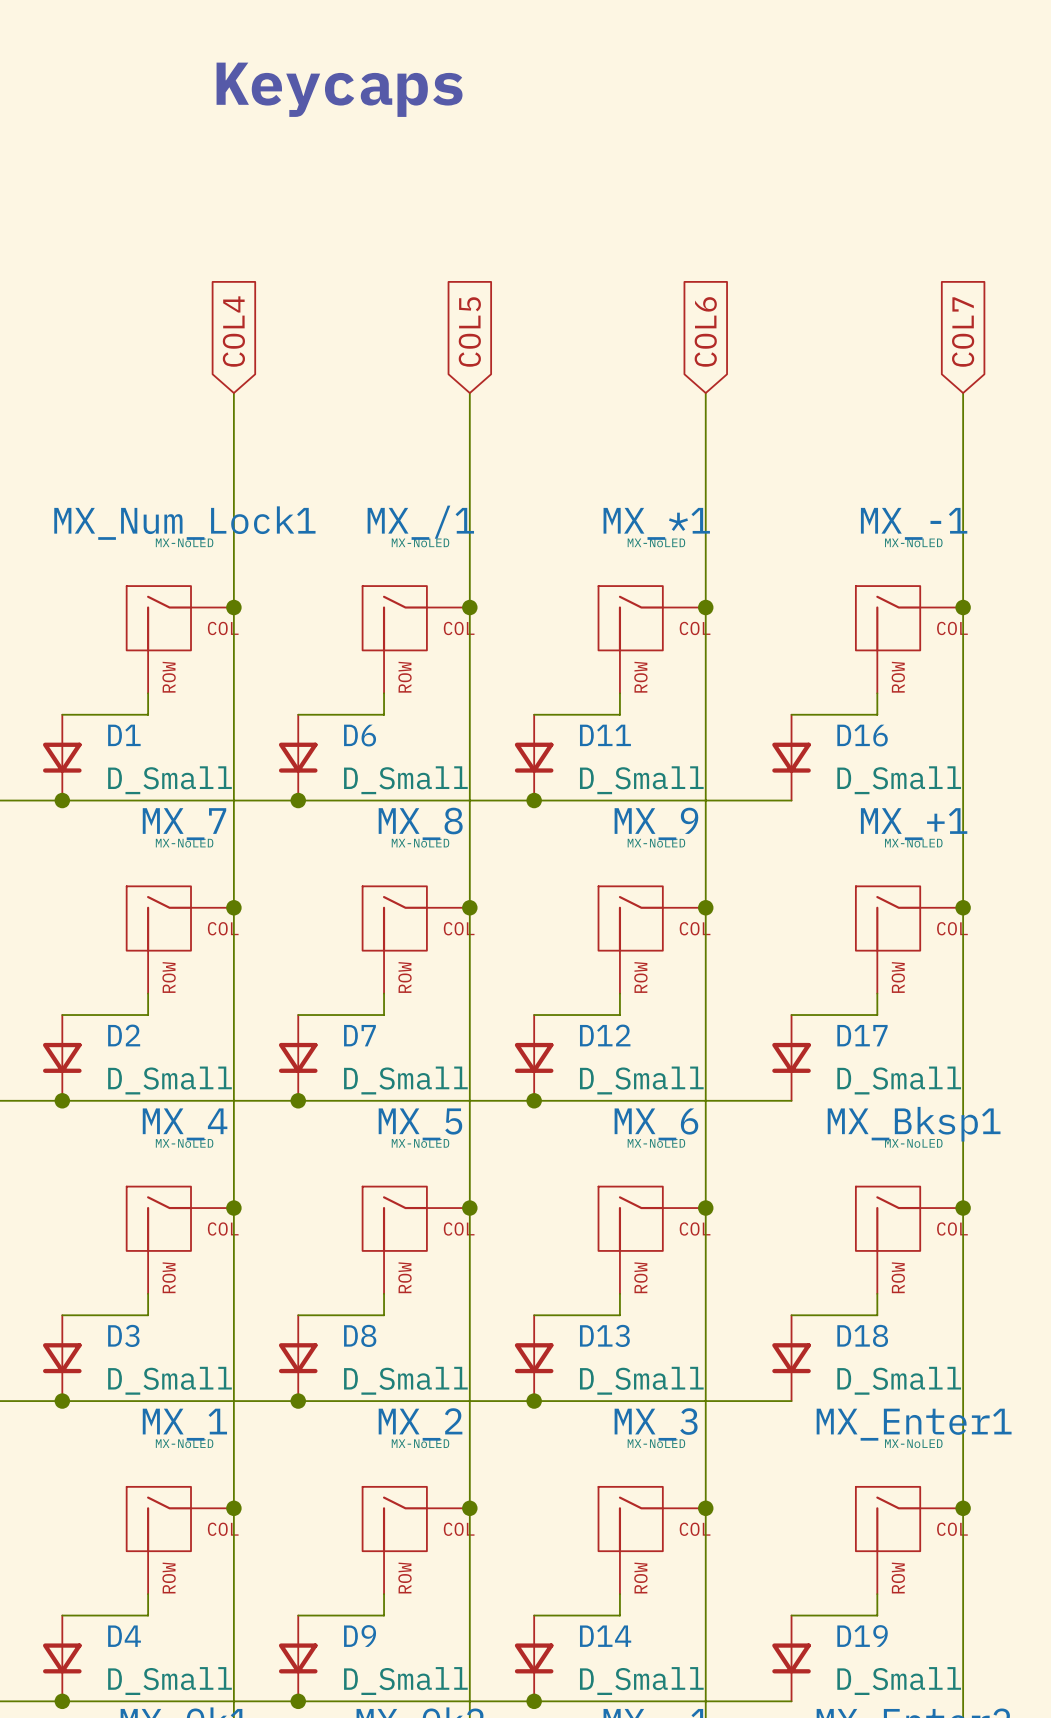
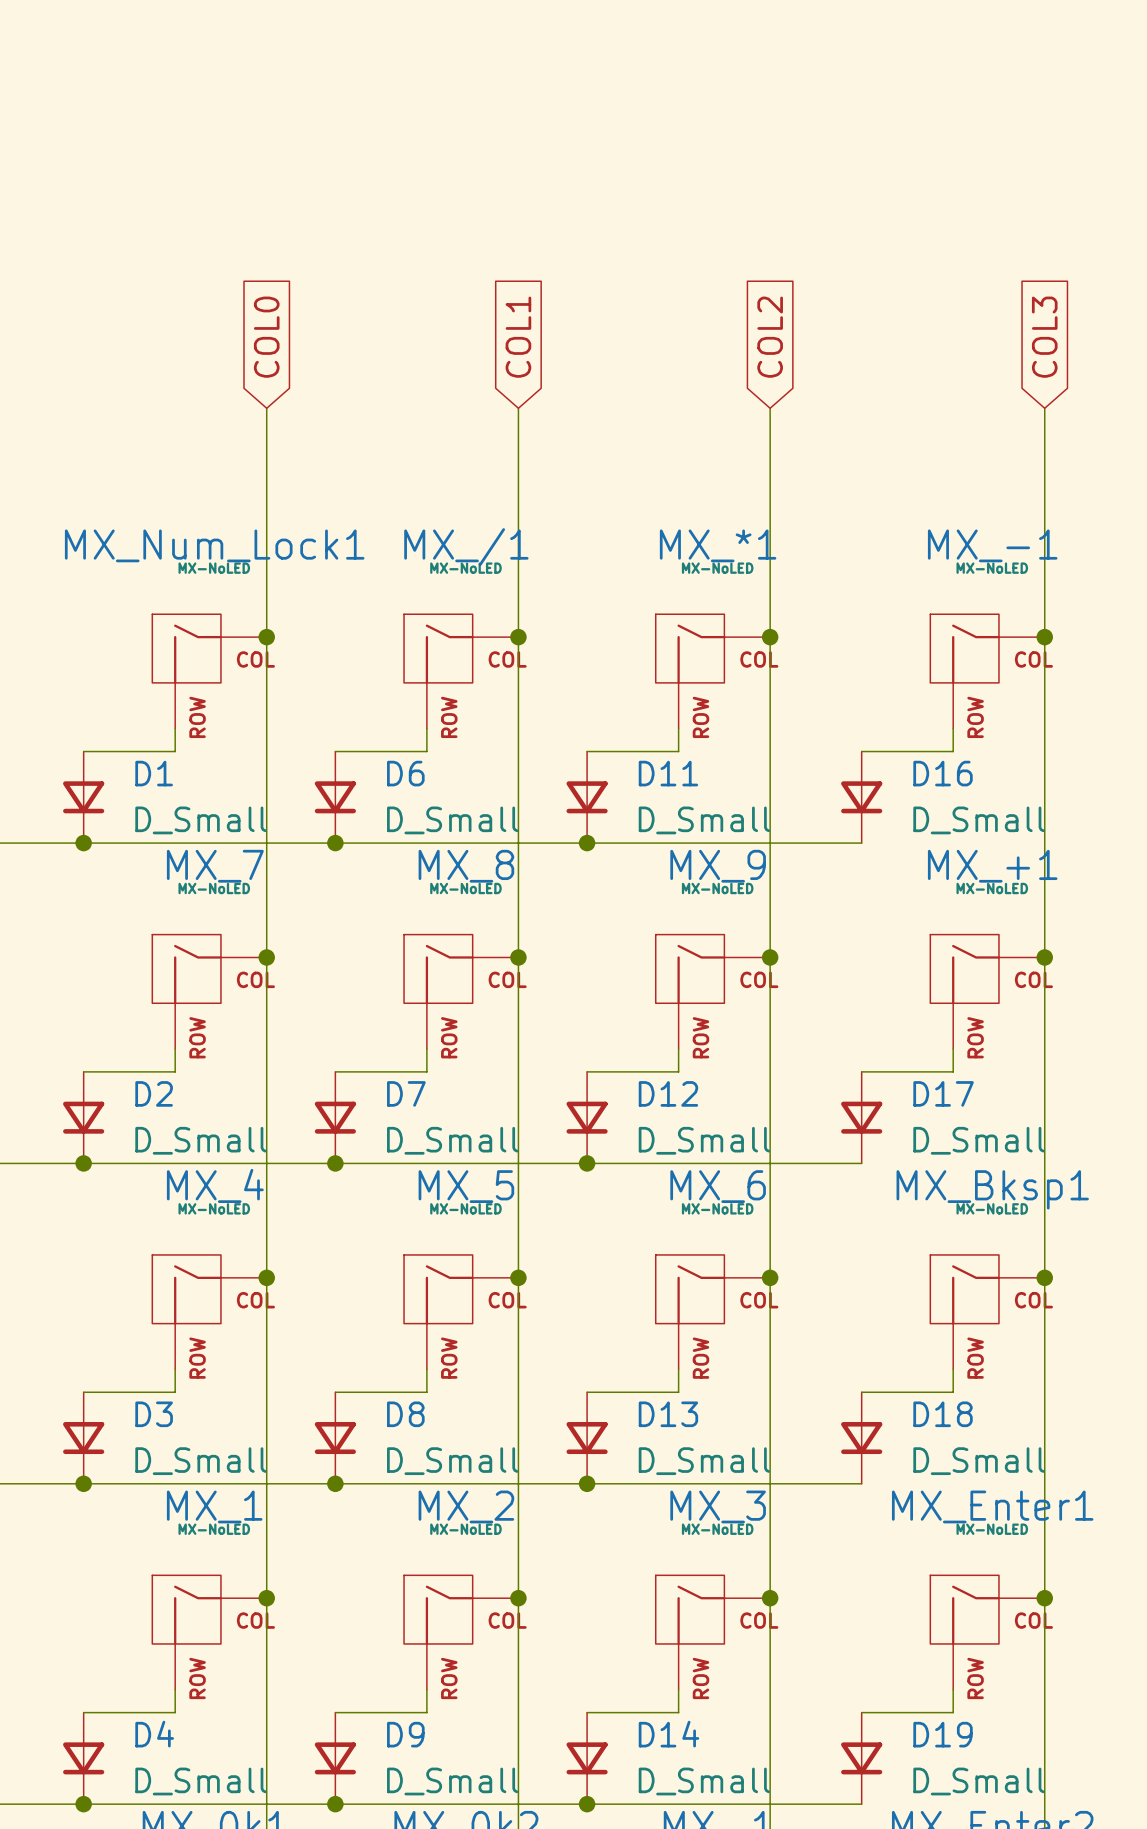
text: Keycaps (339, 89) -> none
global label: COL4 (233, 331) -> COL0 (266, 337)
global label: COL5 (469, 331) -> COL1 (518, 337)
global label: COL6 (705, 331) -> COL2 (770, 337)
global label: COL7 (963, 332) -> COL3 (1044, 337)

